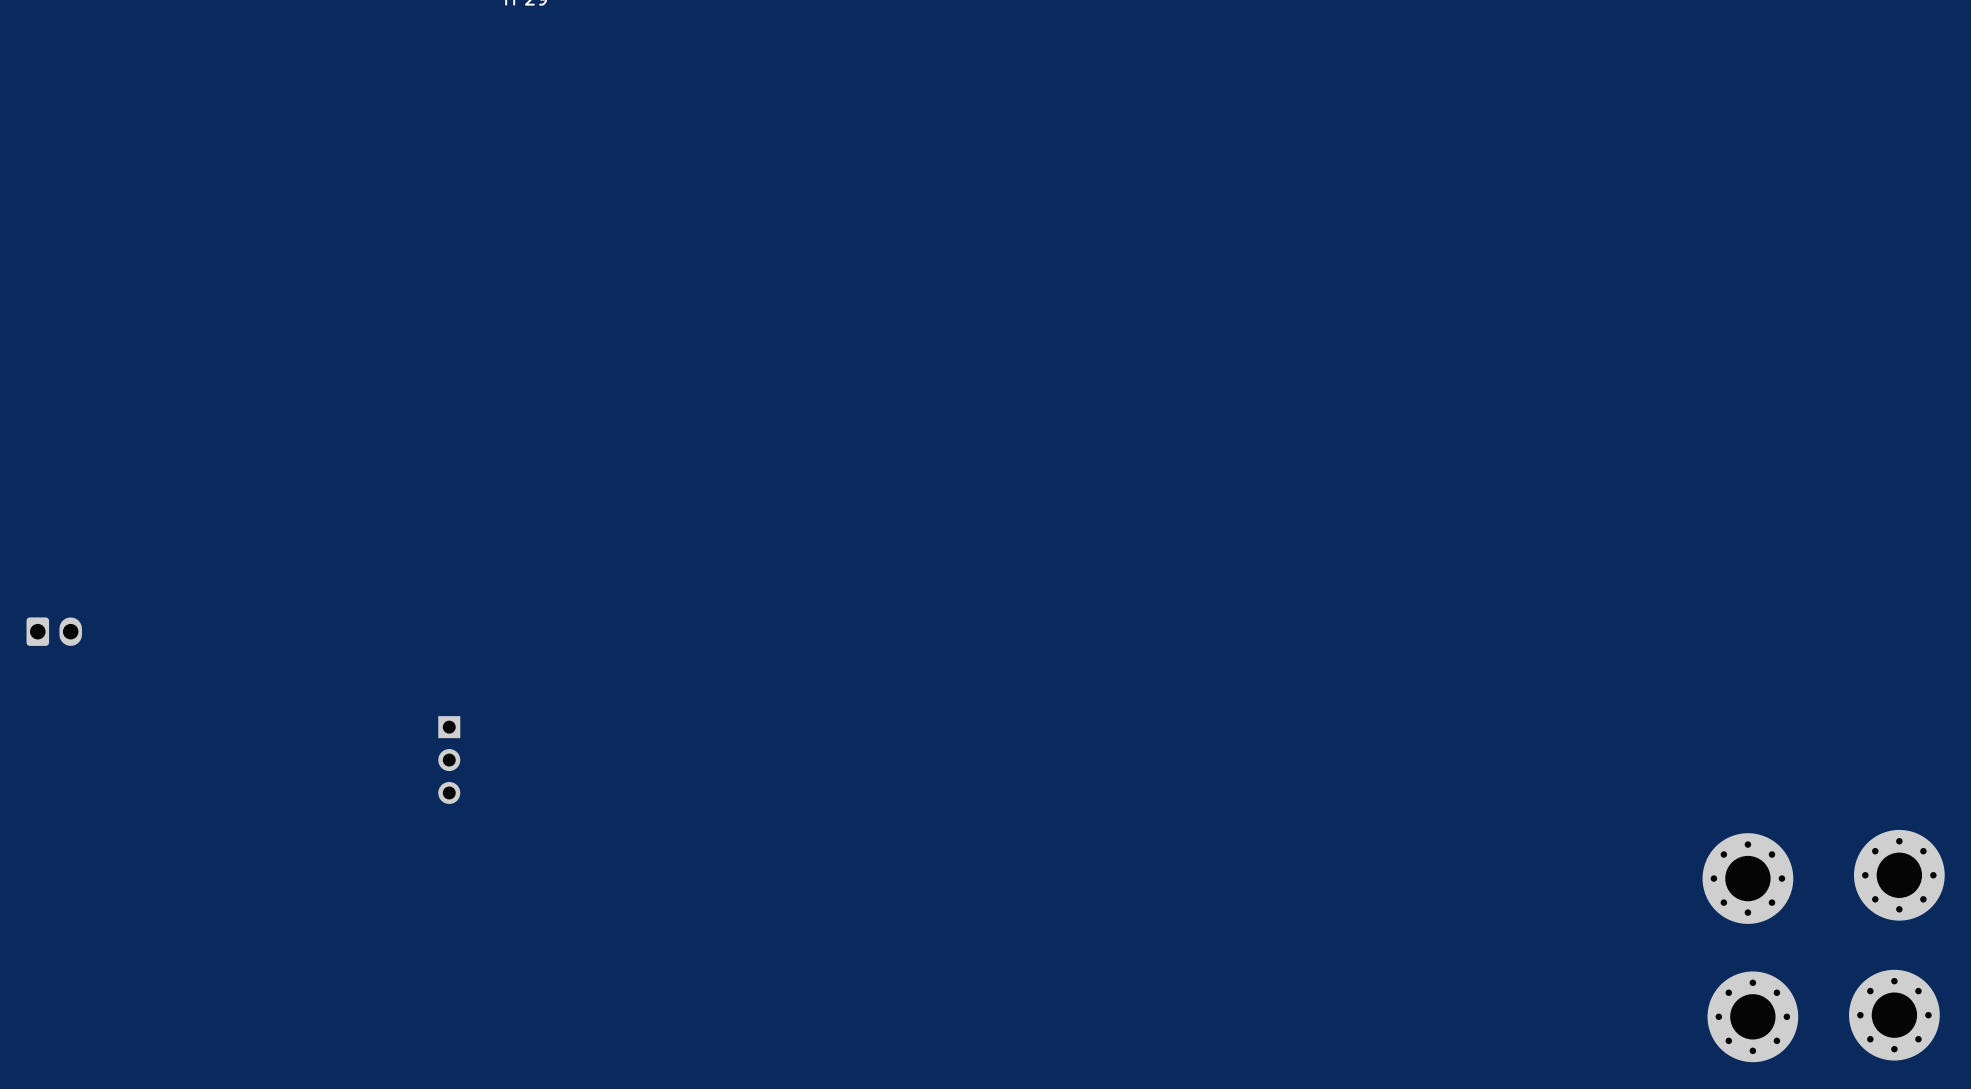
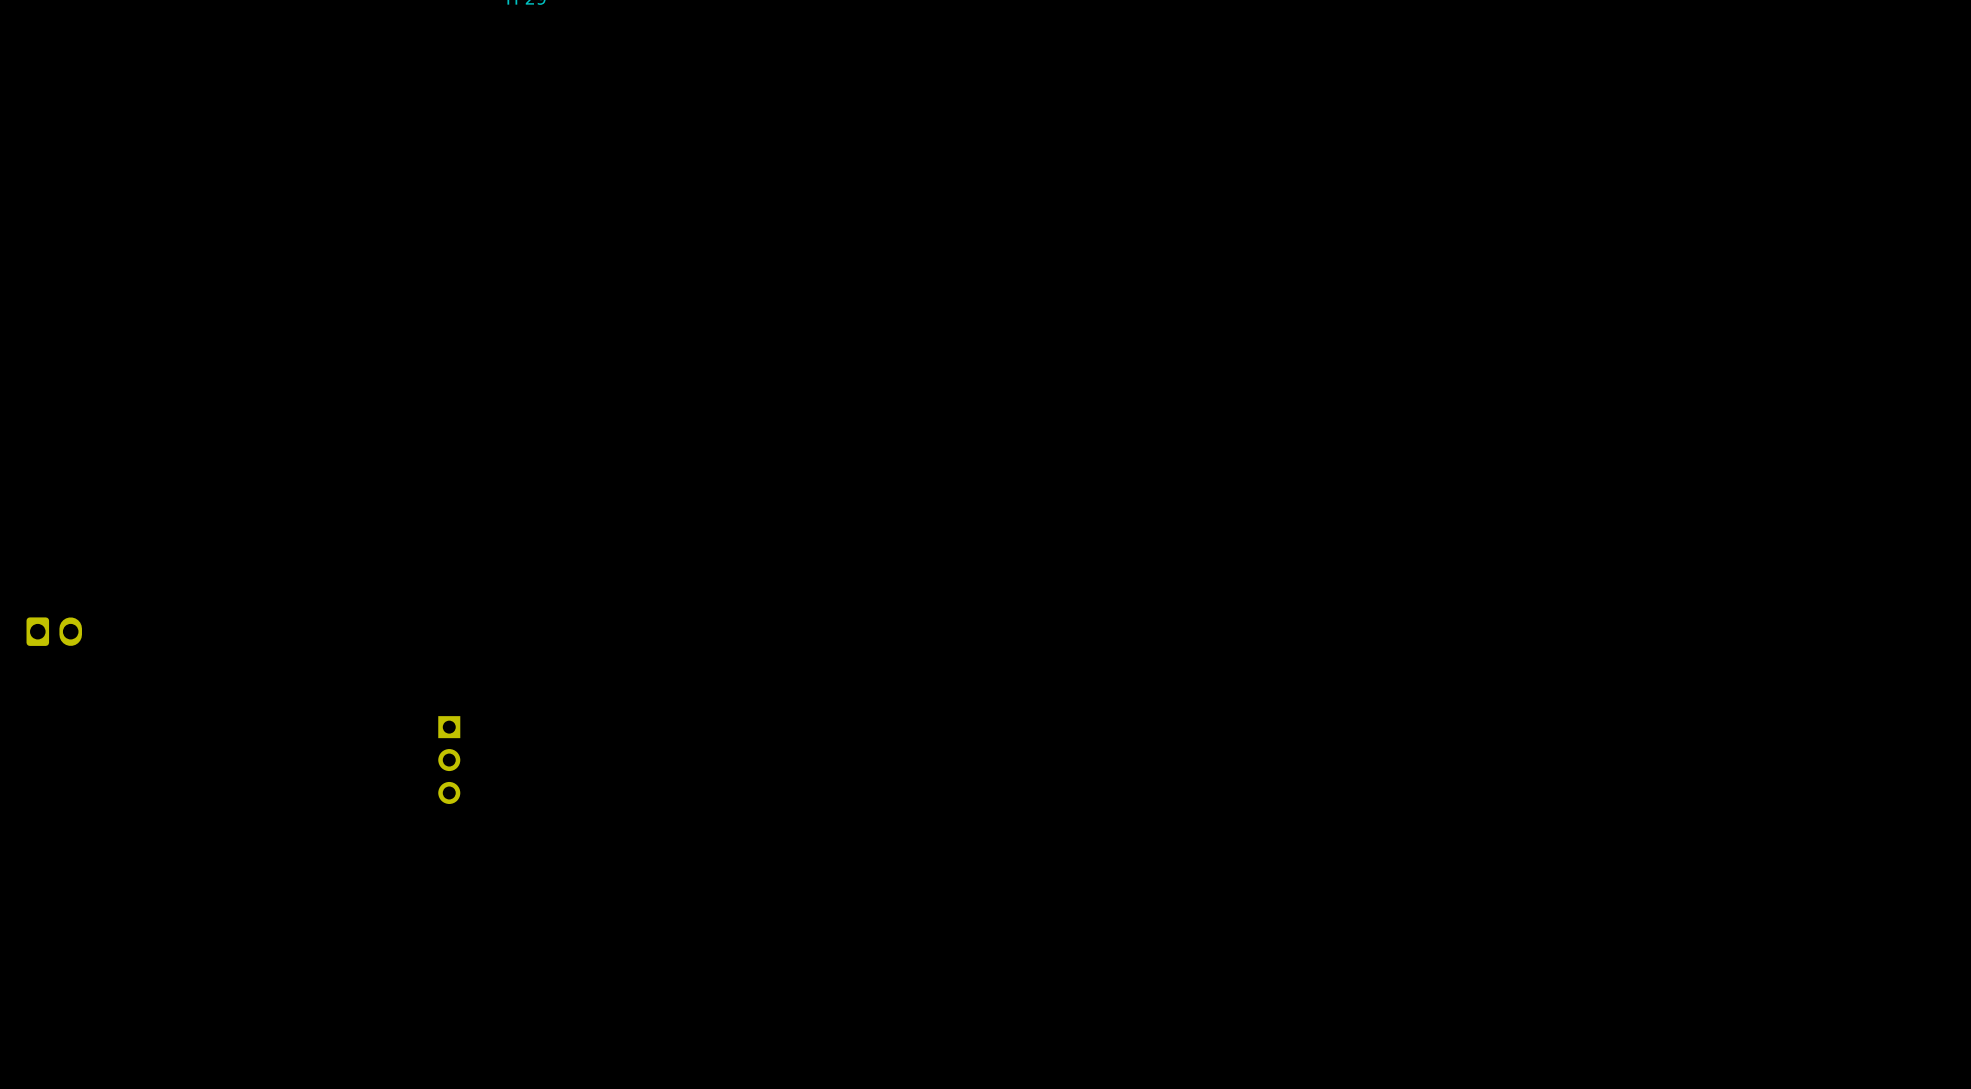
part: (1899, 875) -> none
part: (1747, 878) -> none
part: (1894, 1015) -> none
part: (1752, 1016) -> none

